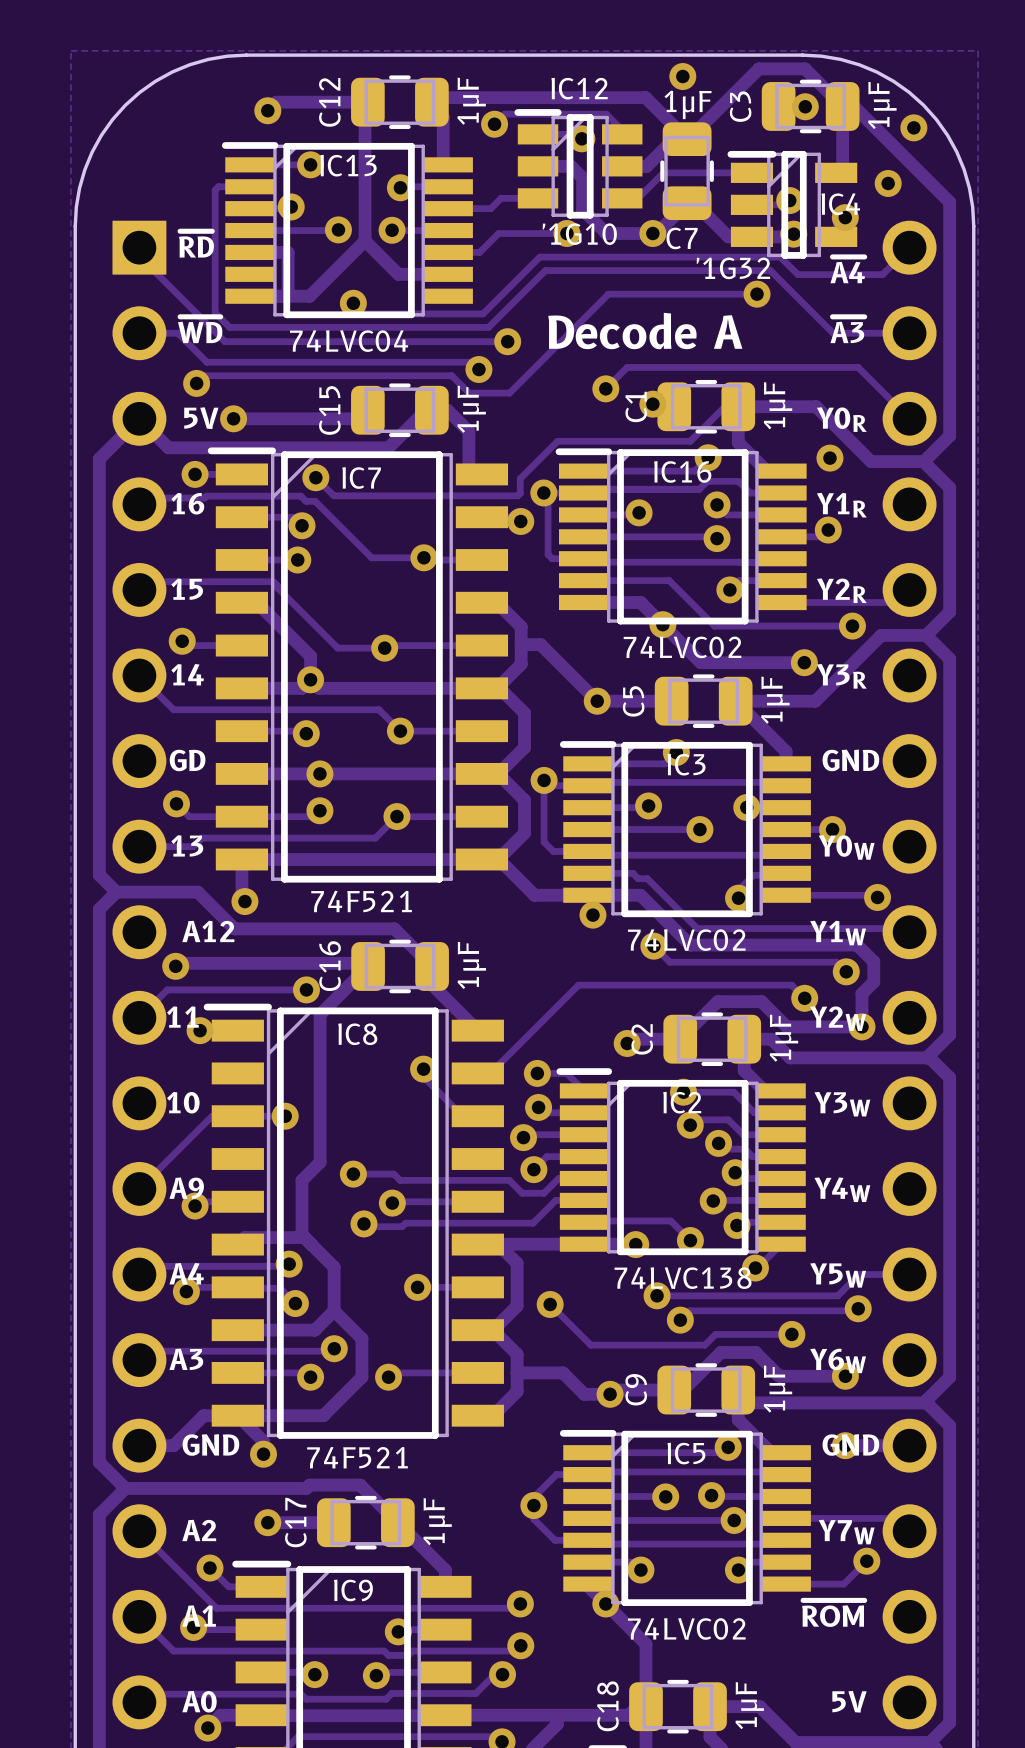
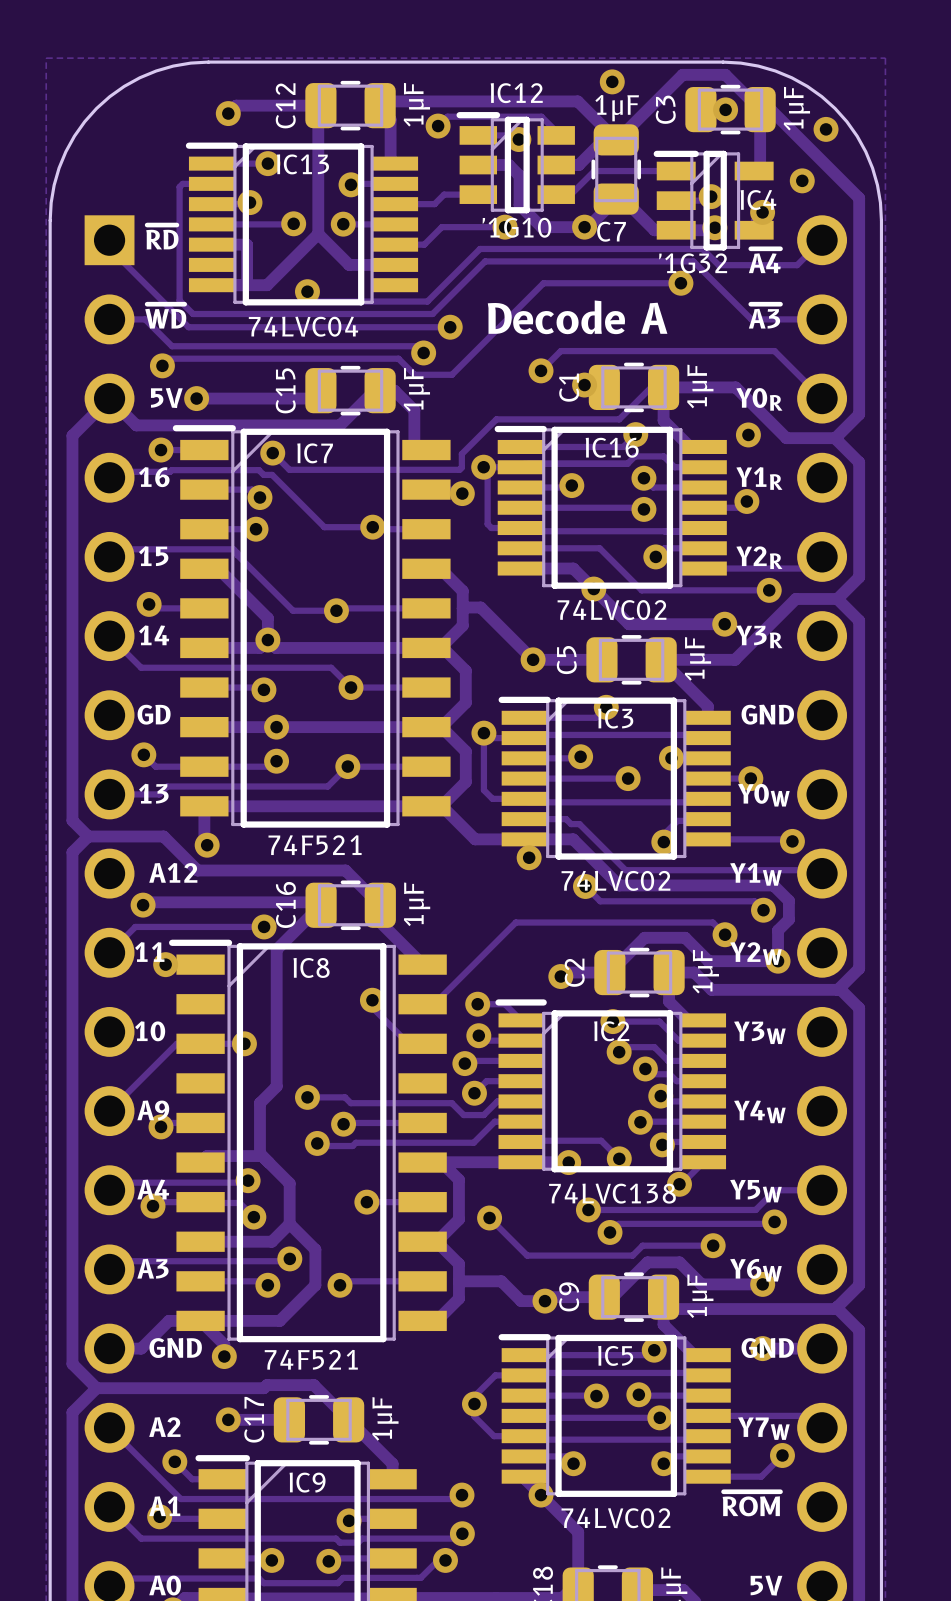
IC4 text position: '1G32 (733, 268) -> '1G32 (693, 263)

